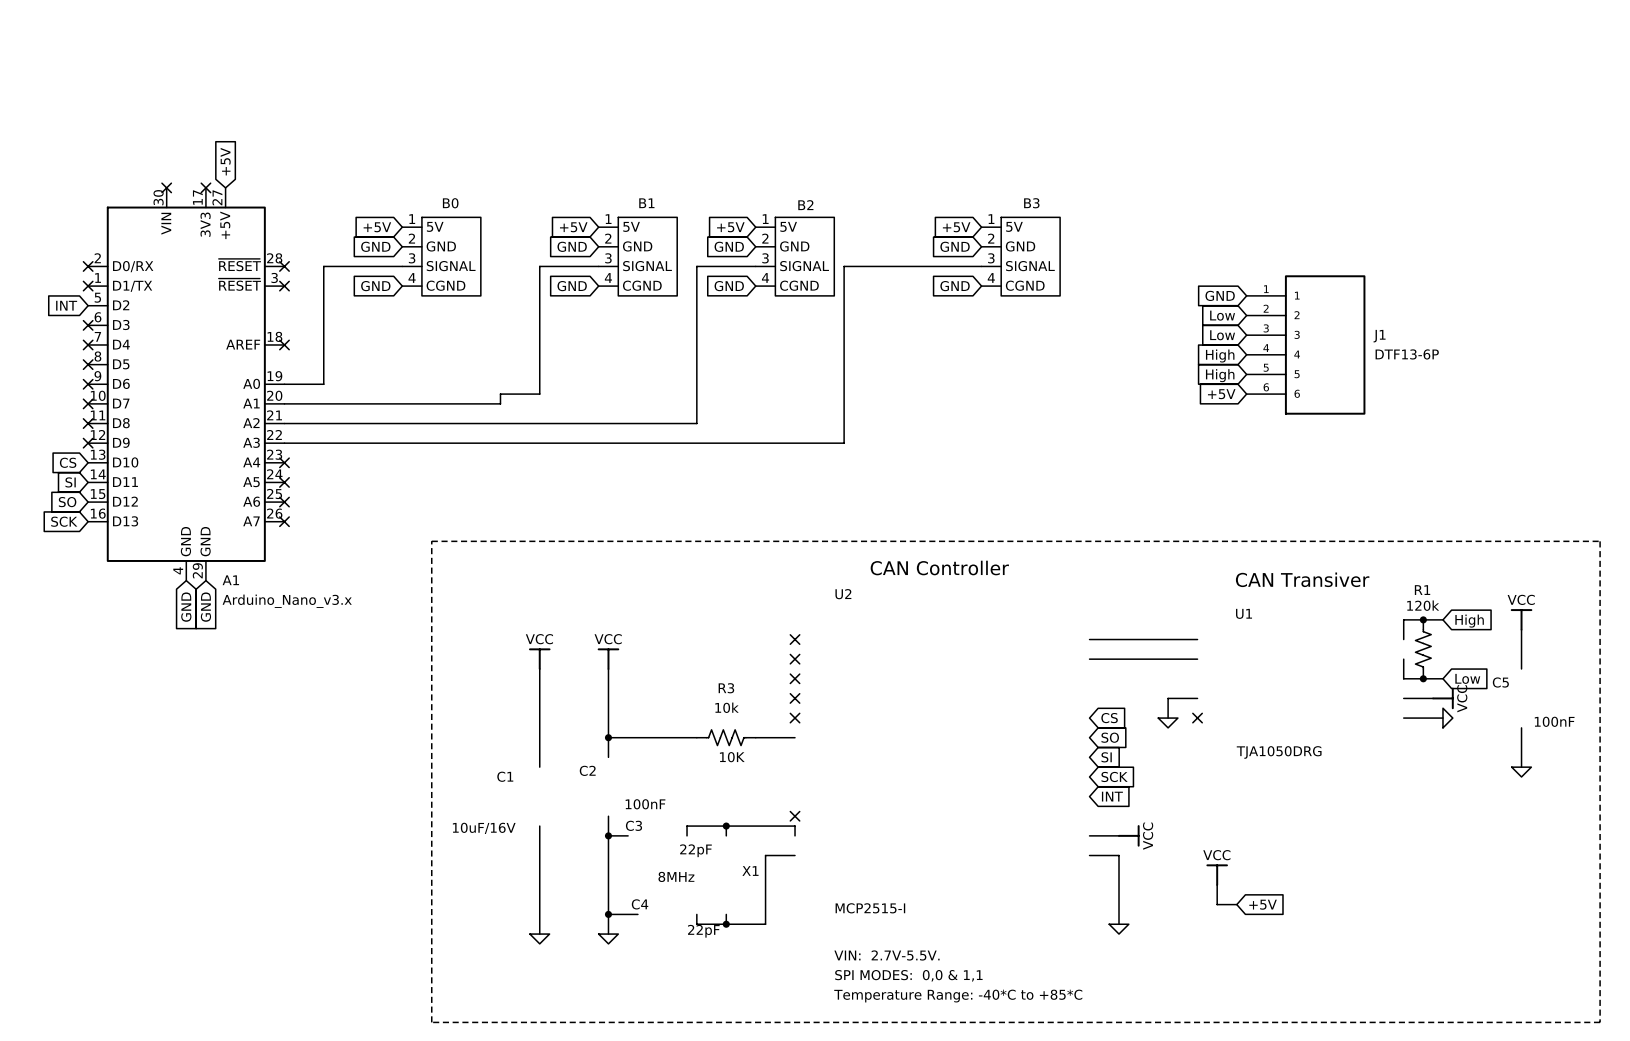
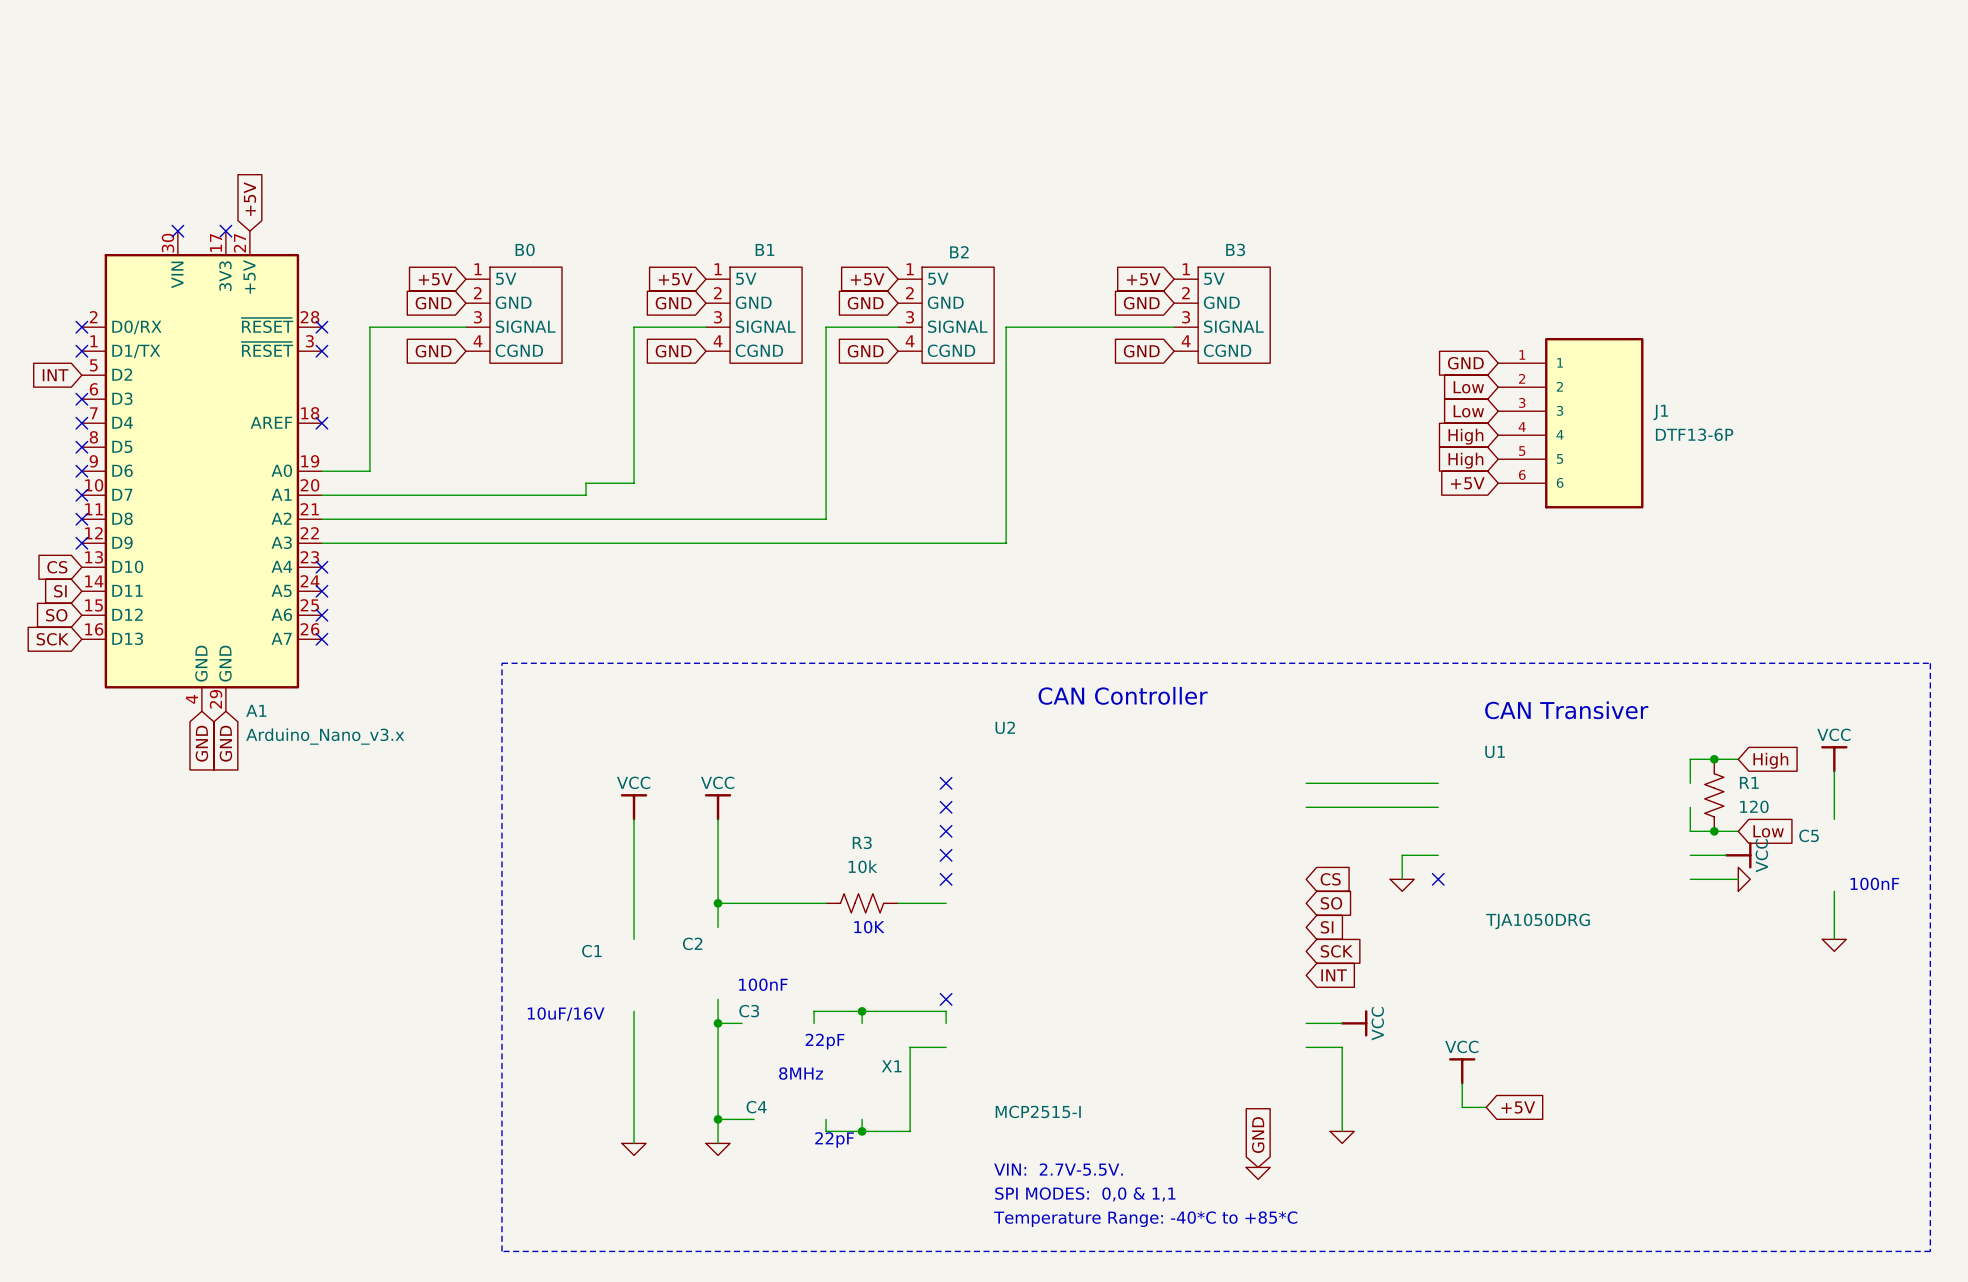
R1 name position: R1 (1422, 590) -> R1 (1749, 782)
R1 value: 120k (1423, 605) -> 120 (1754, 806)
global label: none -> GND (1258, 1135)
power symbol: none -> (1258, 1173)

